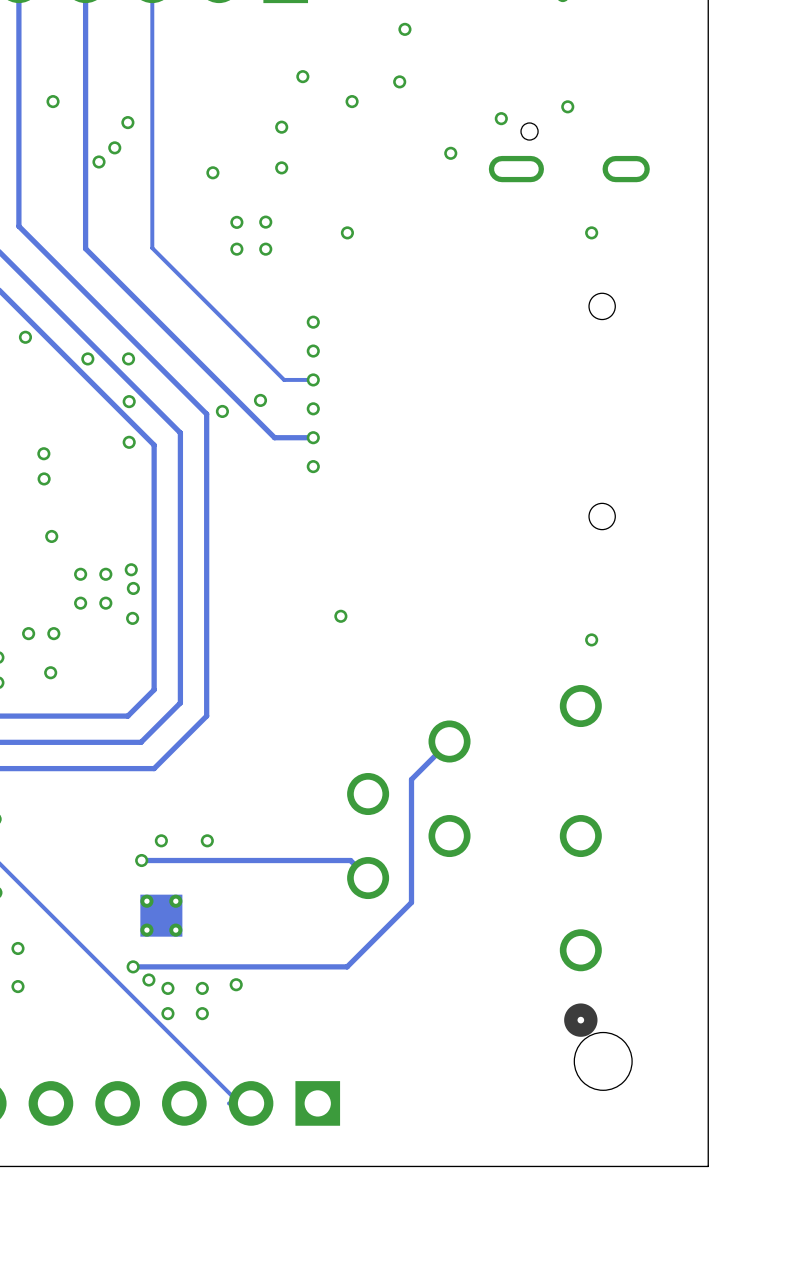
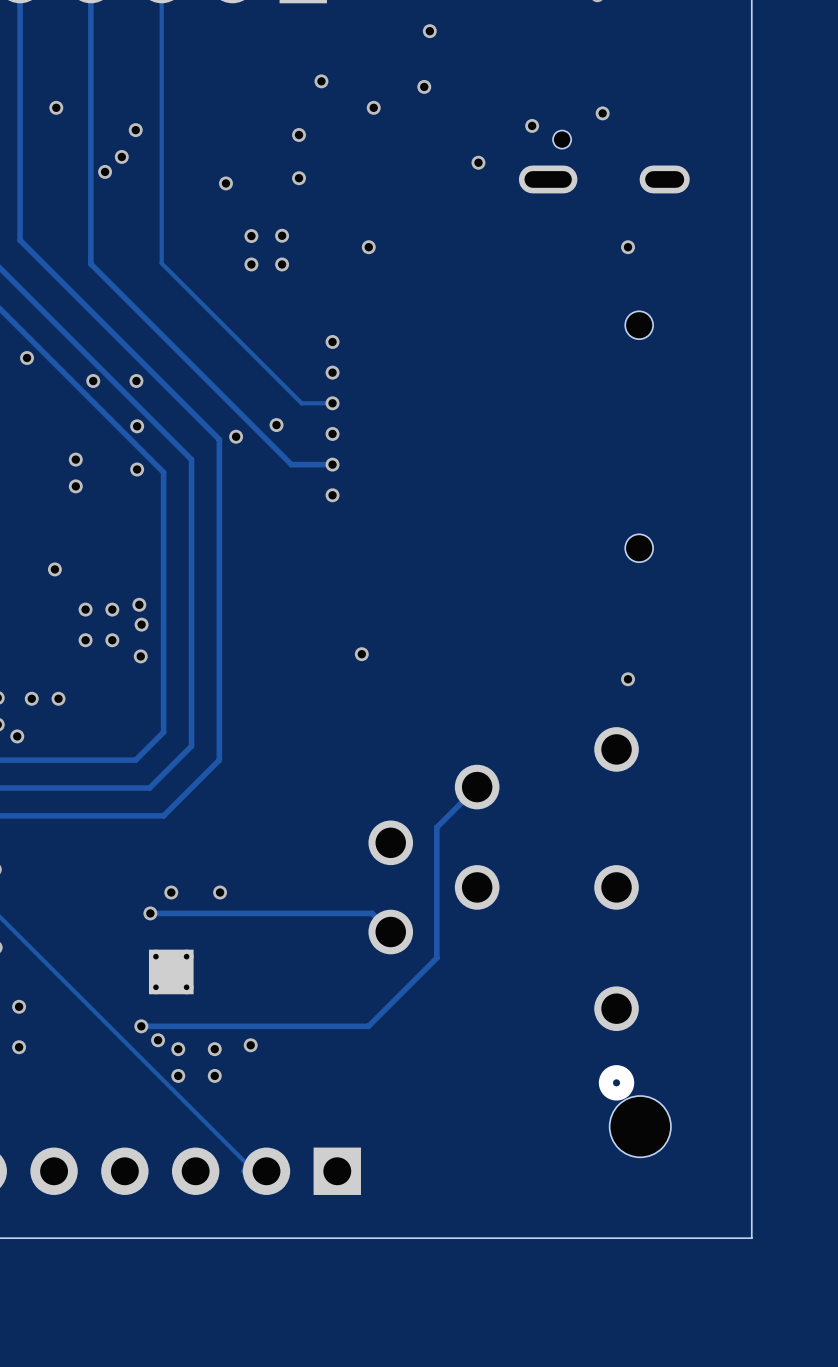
via: none -> (75, 459)
via: (43, 453) -> none
via: none -> (75, 486)
via: (44, 478) -> none
via: (28, 633) -> none
via: (53, 633) -> none
via: none -> (31, 698)
via: none -> (58, 698)
via: (50, 672) -> none
via: none -> (17, 736)

